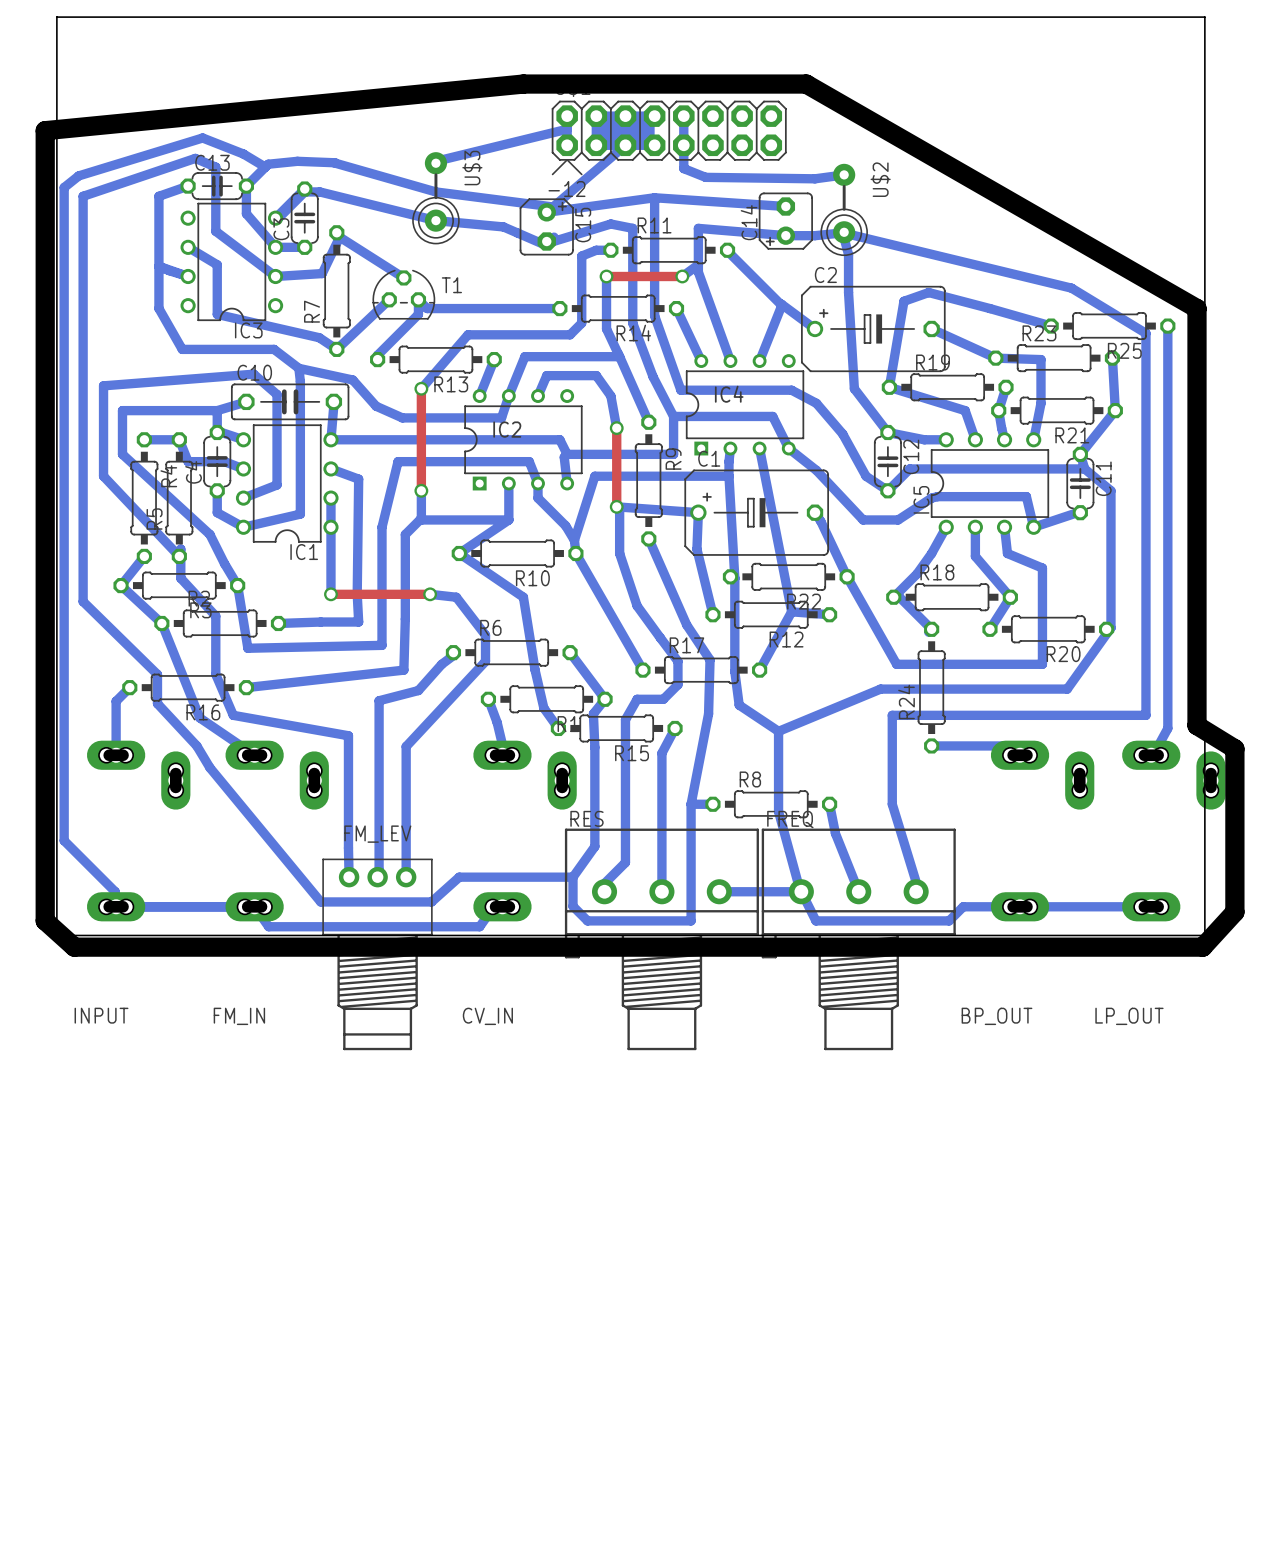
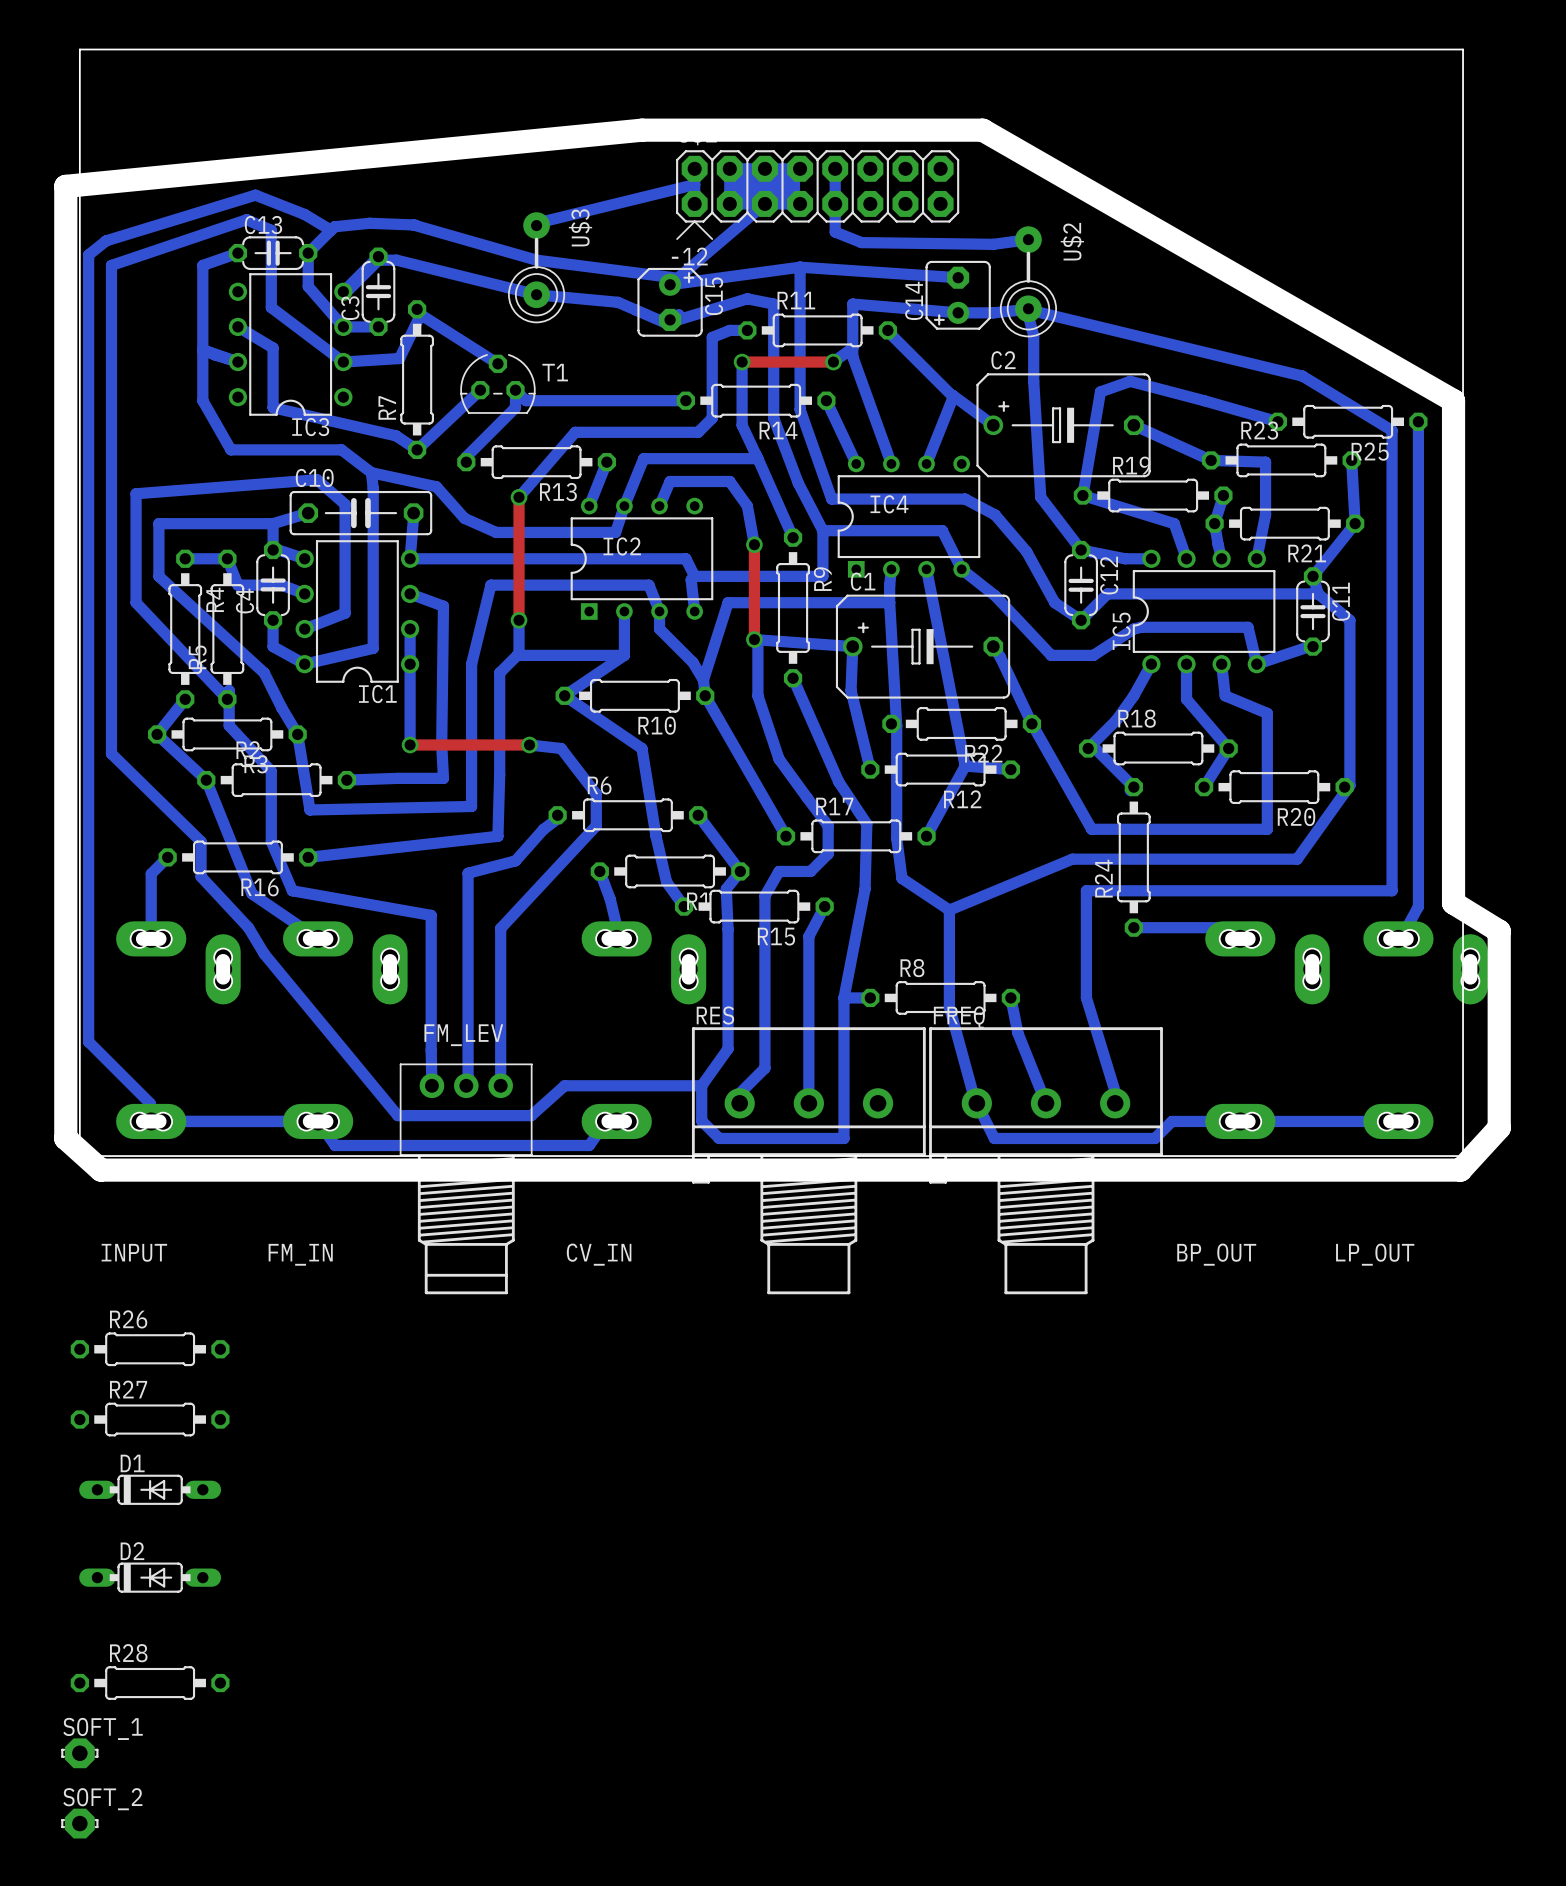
bottom track: (719, 891) (800, 891) -> none
R26: none -> (150, 1349)
R27: none -> (150, 1419)
D1: none -> (150, 1489)
D2: none -> (150, 1577)
R28: none -> (150, 1683)
SOFT_1: none -> (79, 1753)
SOFT_2: none -> (79, 1823)

